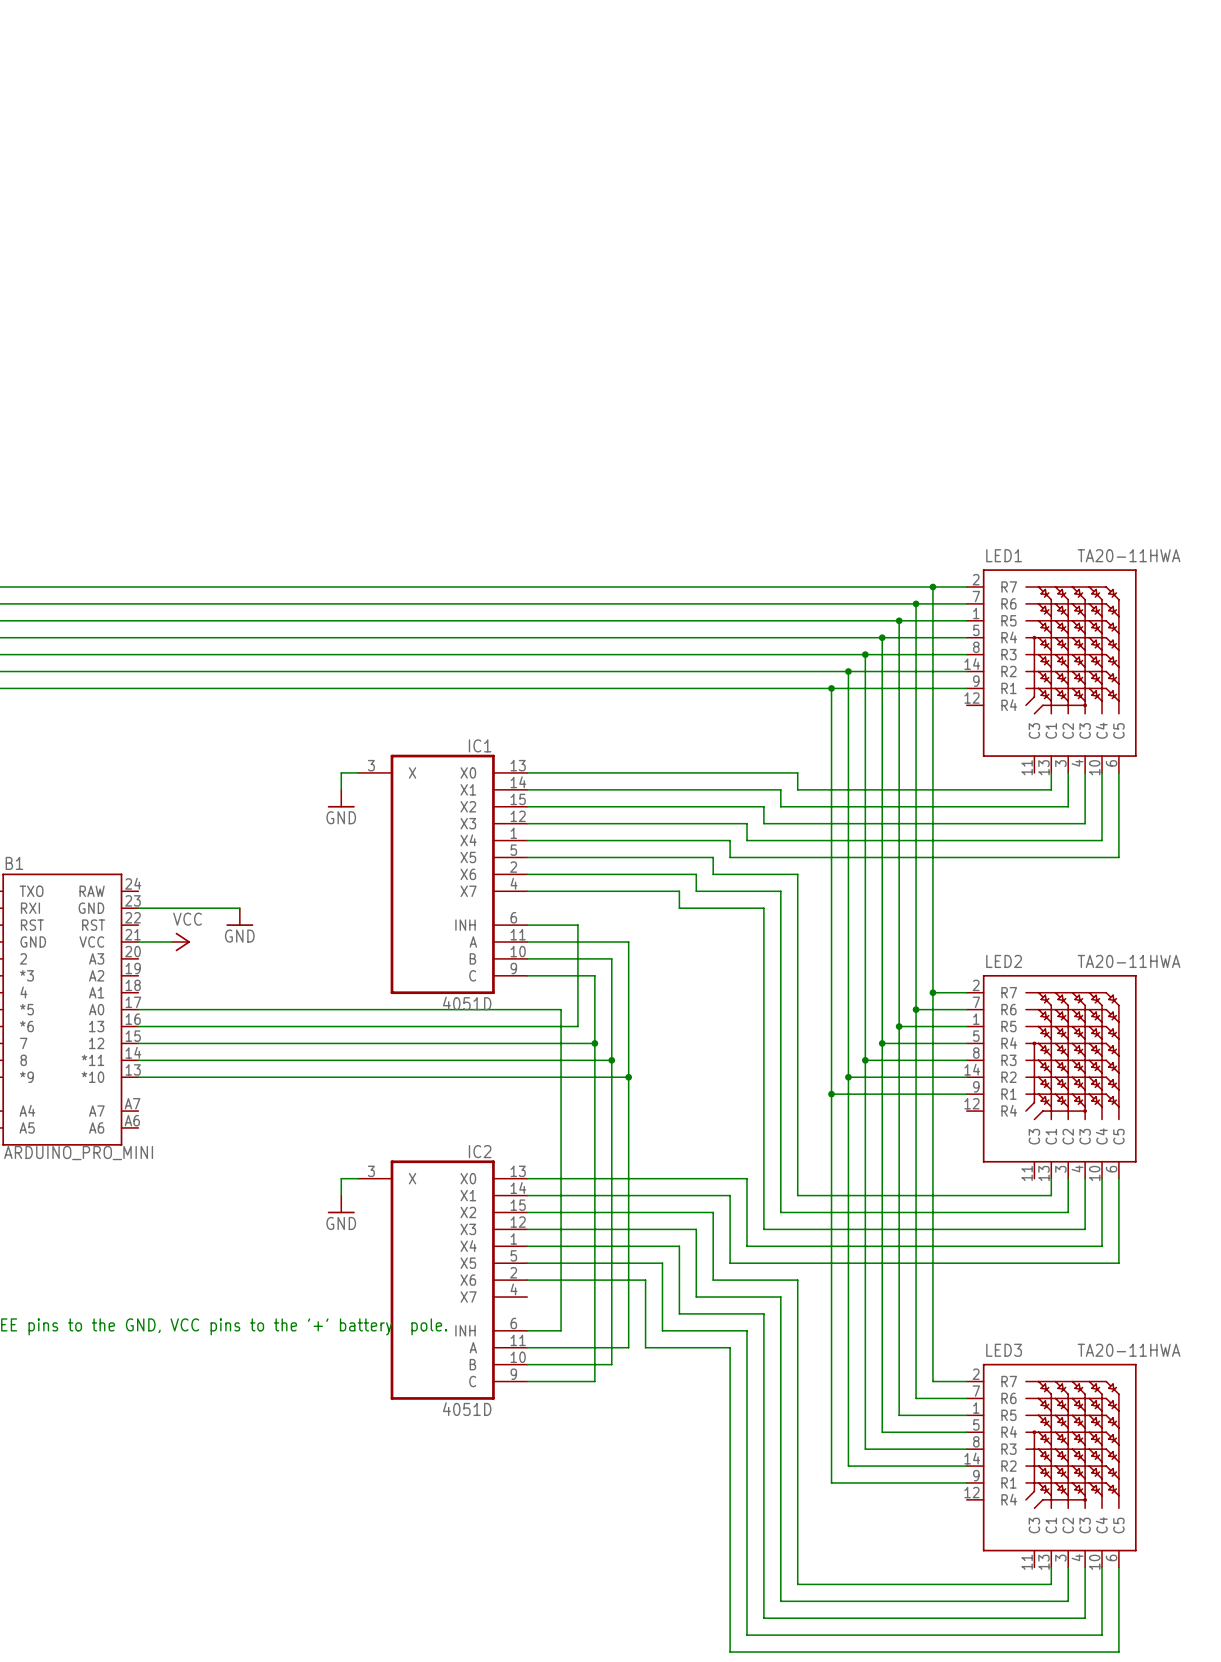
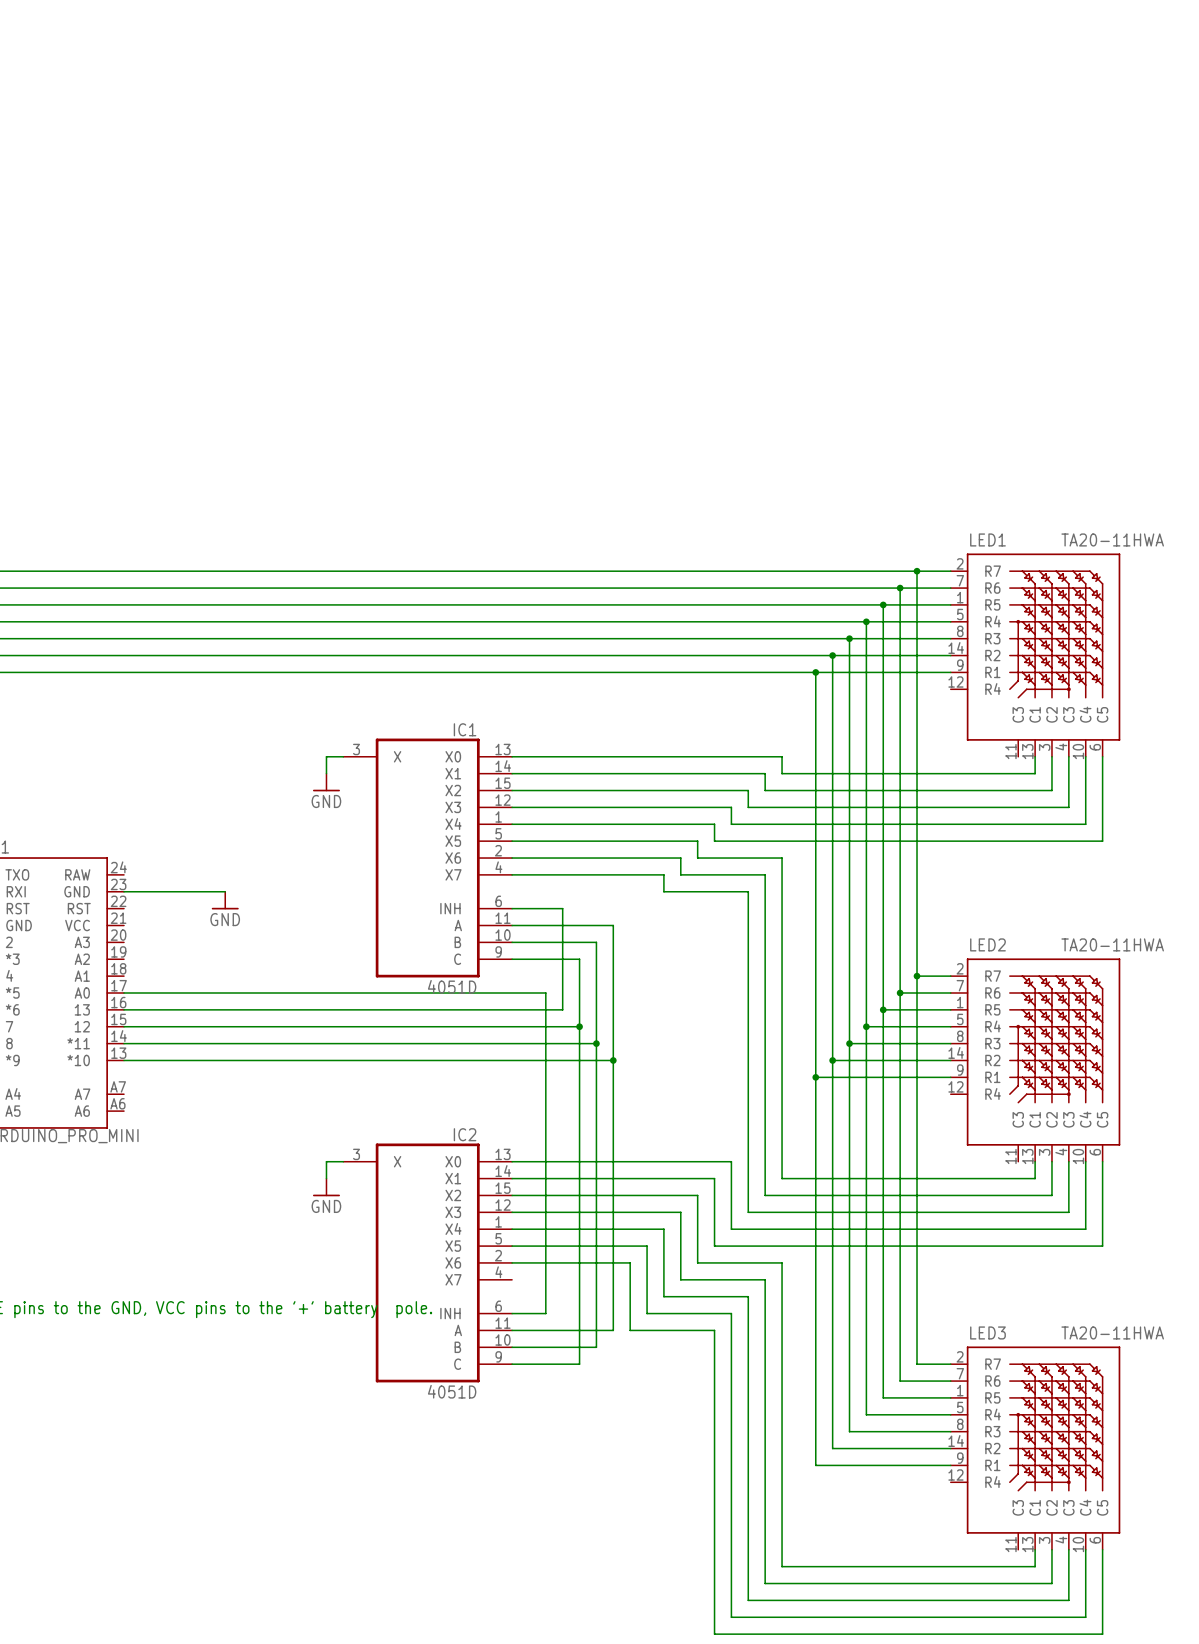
wire: (138, 942) (172, 942) -> none
power symbol: VCC (181, 942) -> none

